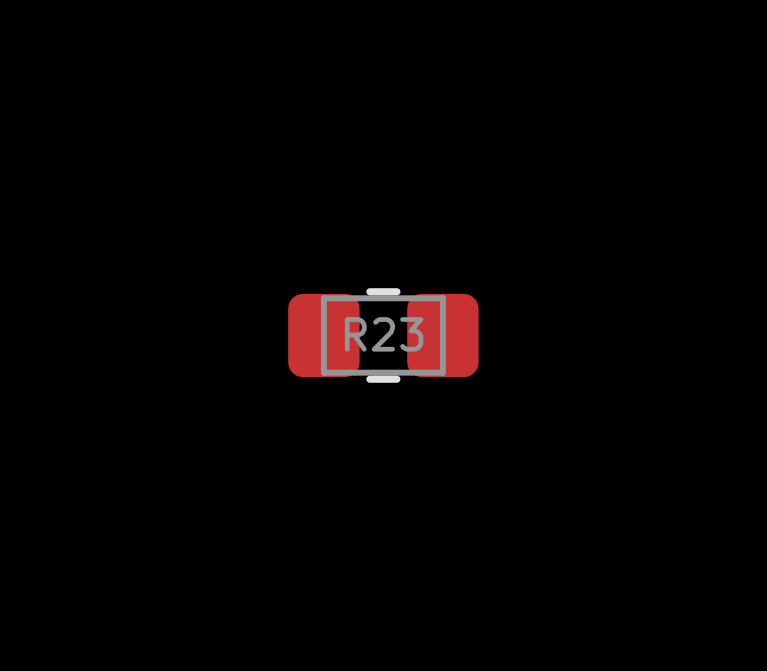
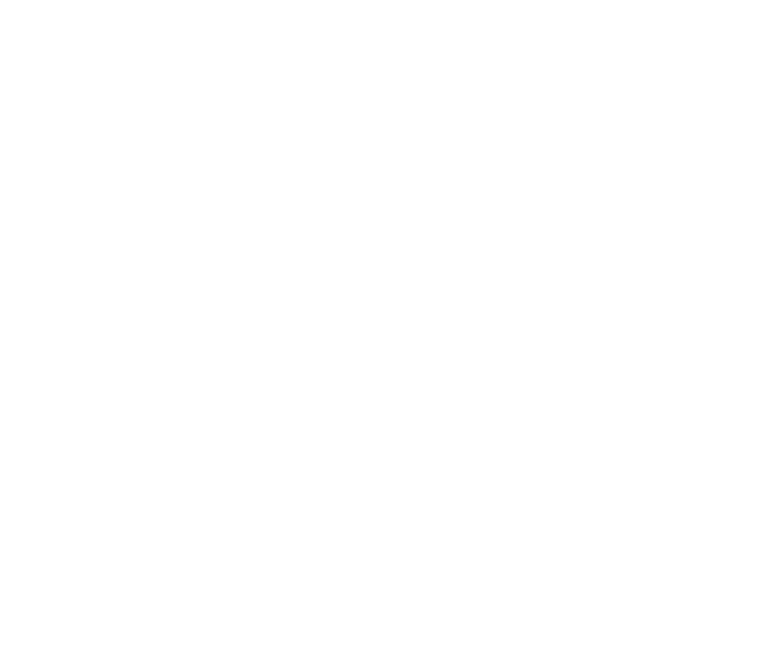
R23: (383, 335) -> none

